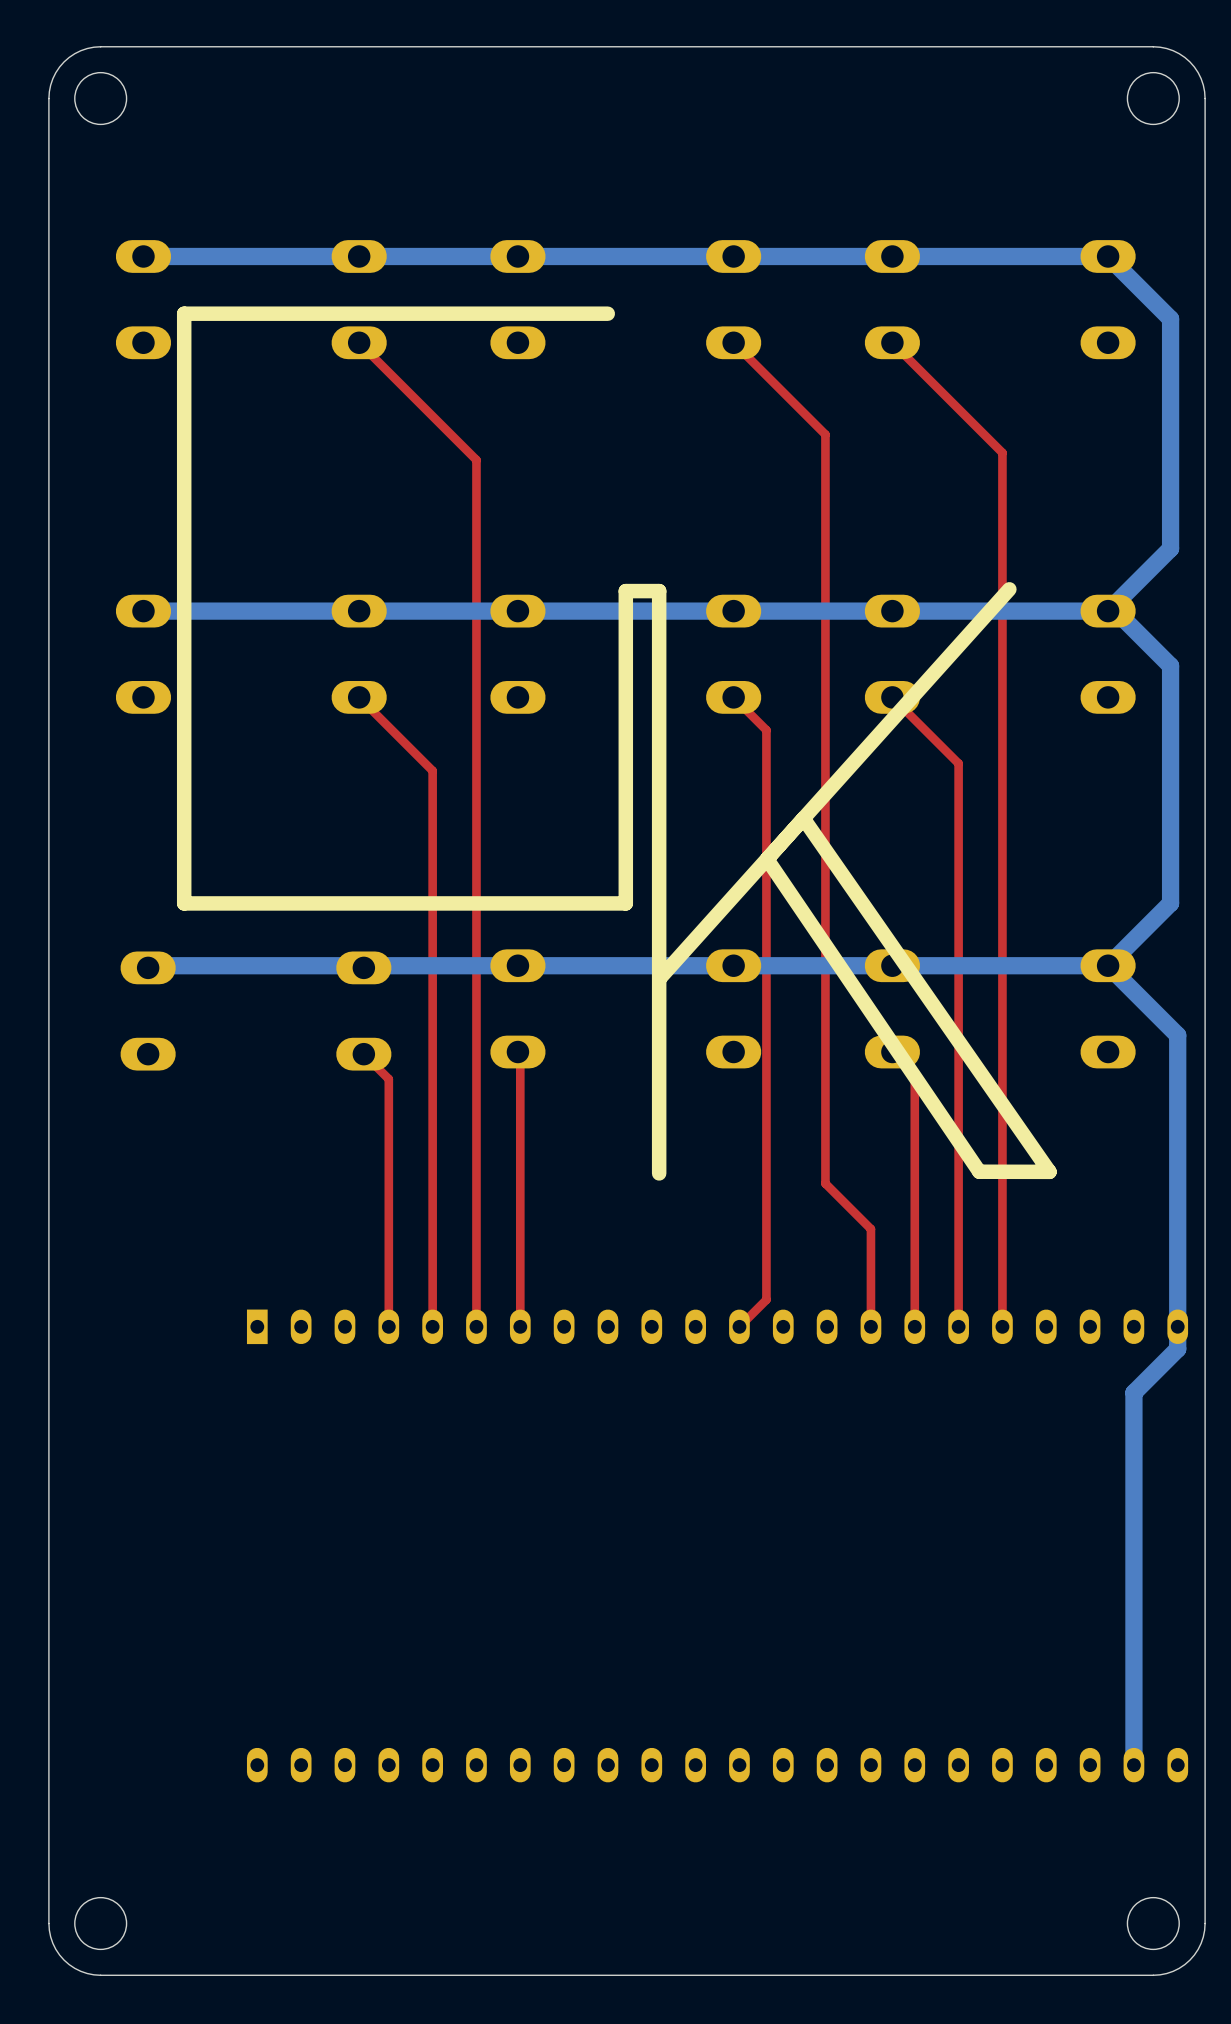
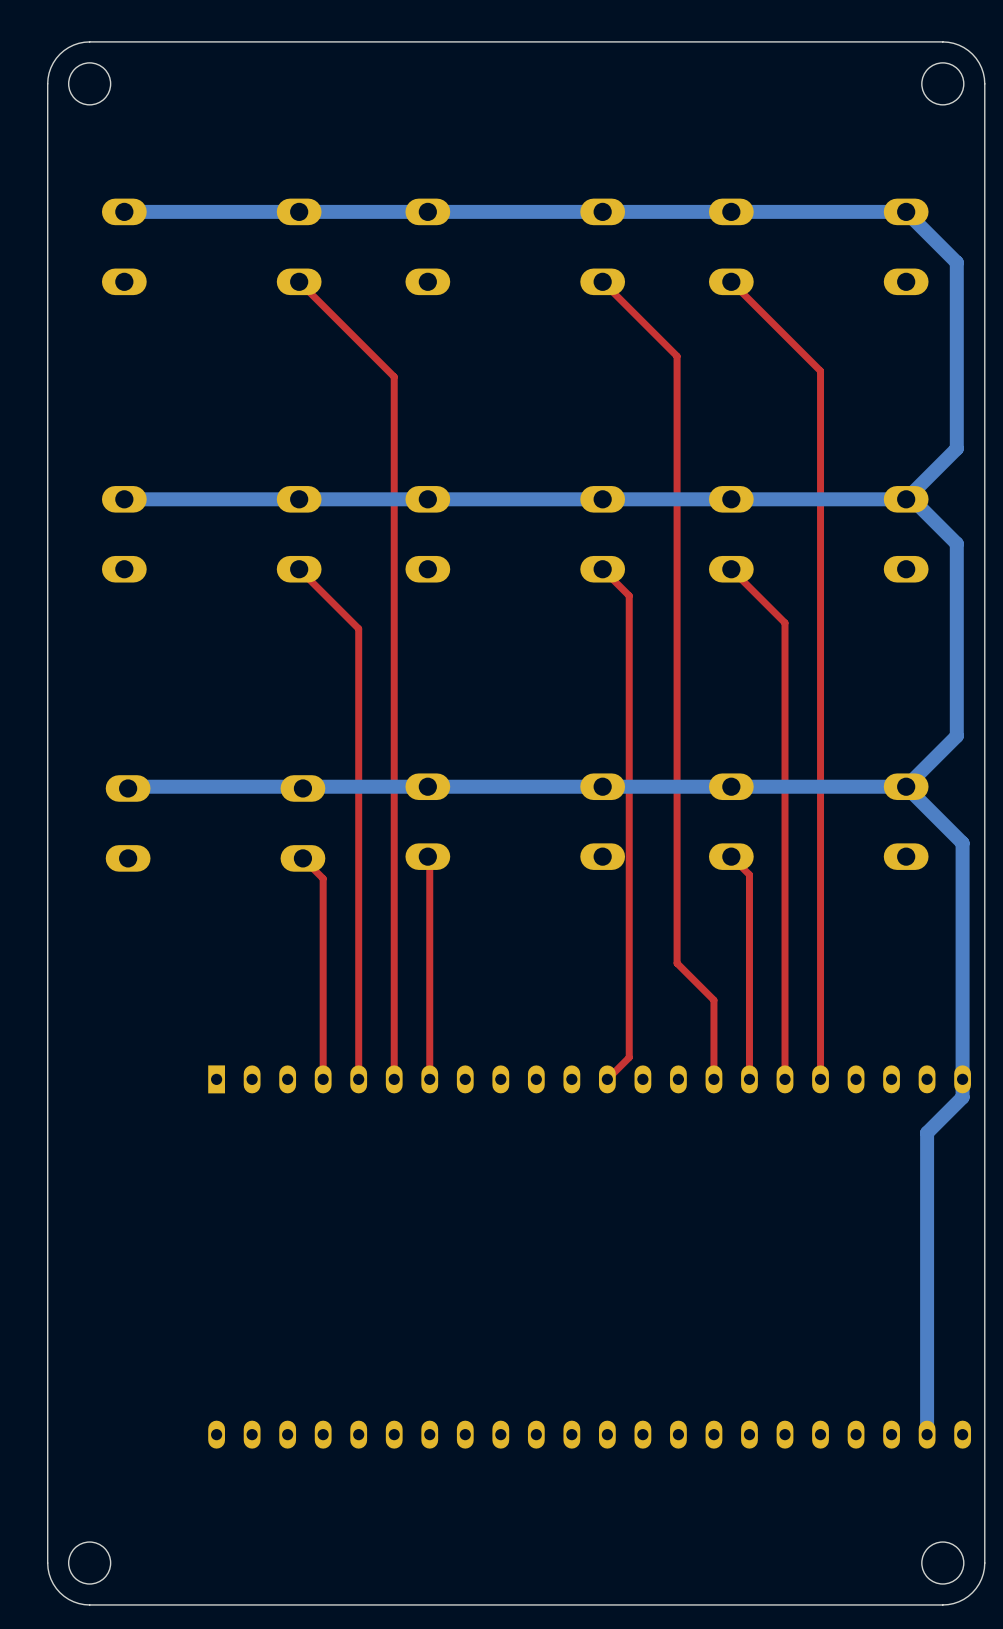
line: (607, 313) (184, 313) (184, 903) (625, 903) (625, 591) (659, 591) (659, 1173) -> none
line: (1009, 589) (659, 979) -> none
line: (803, 818) (1049, 1171) (979, 1171) (767, 859) (803, 818) -> none

